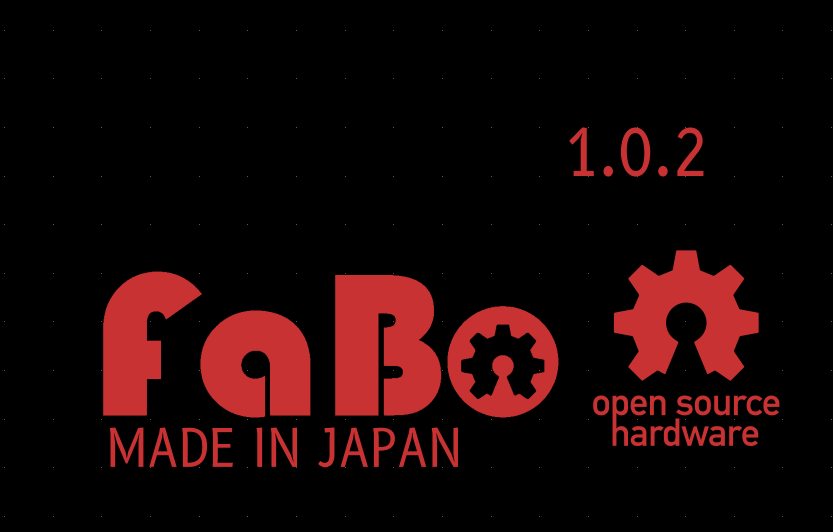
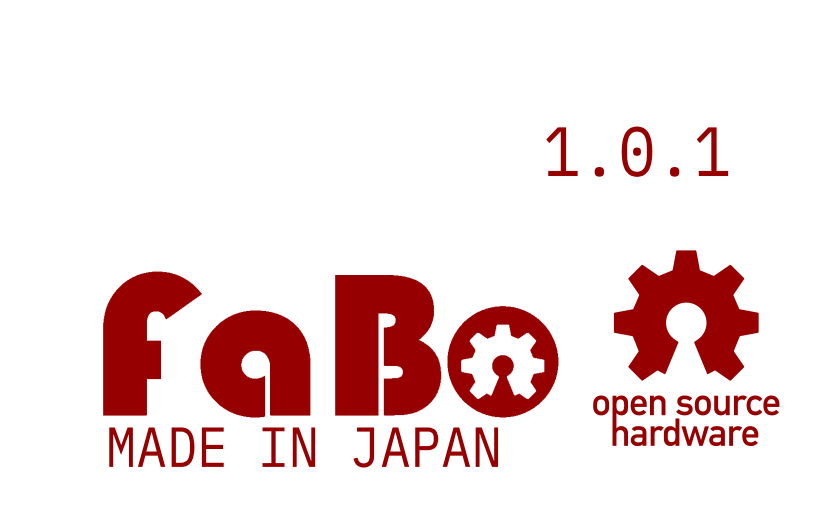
text: 1.0.2 (636, 151) -> 1.0.1 (637, 151)

